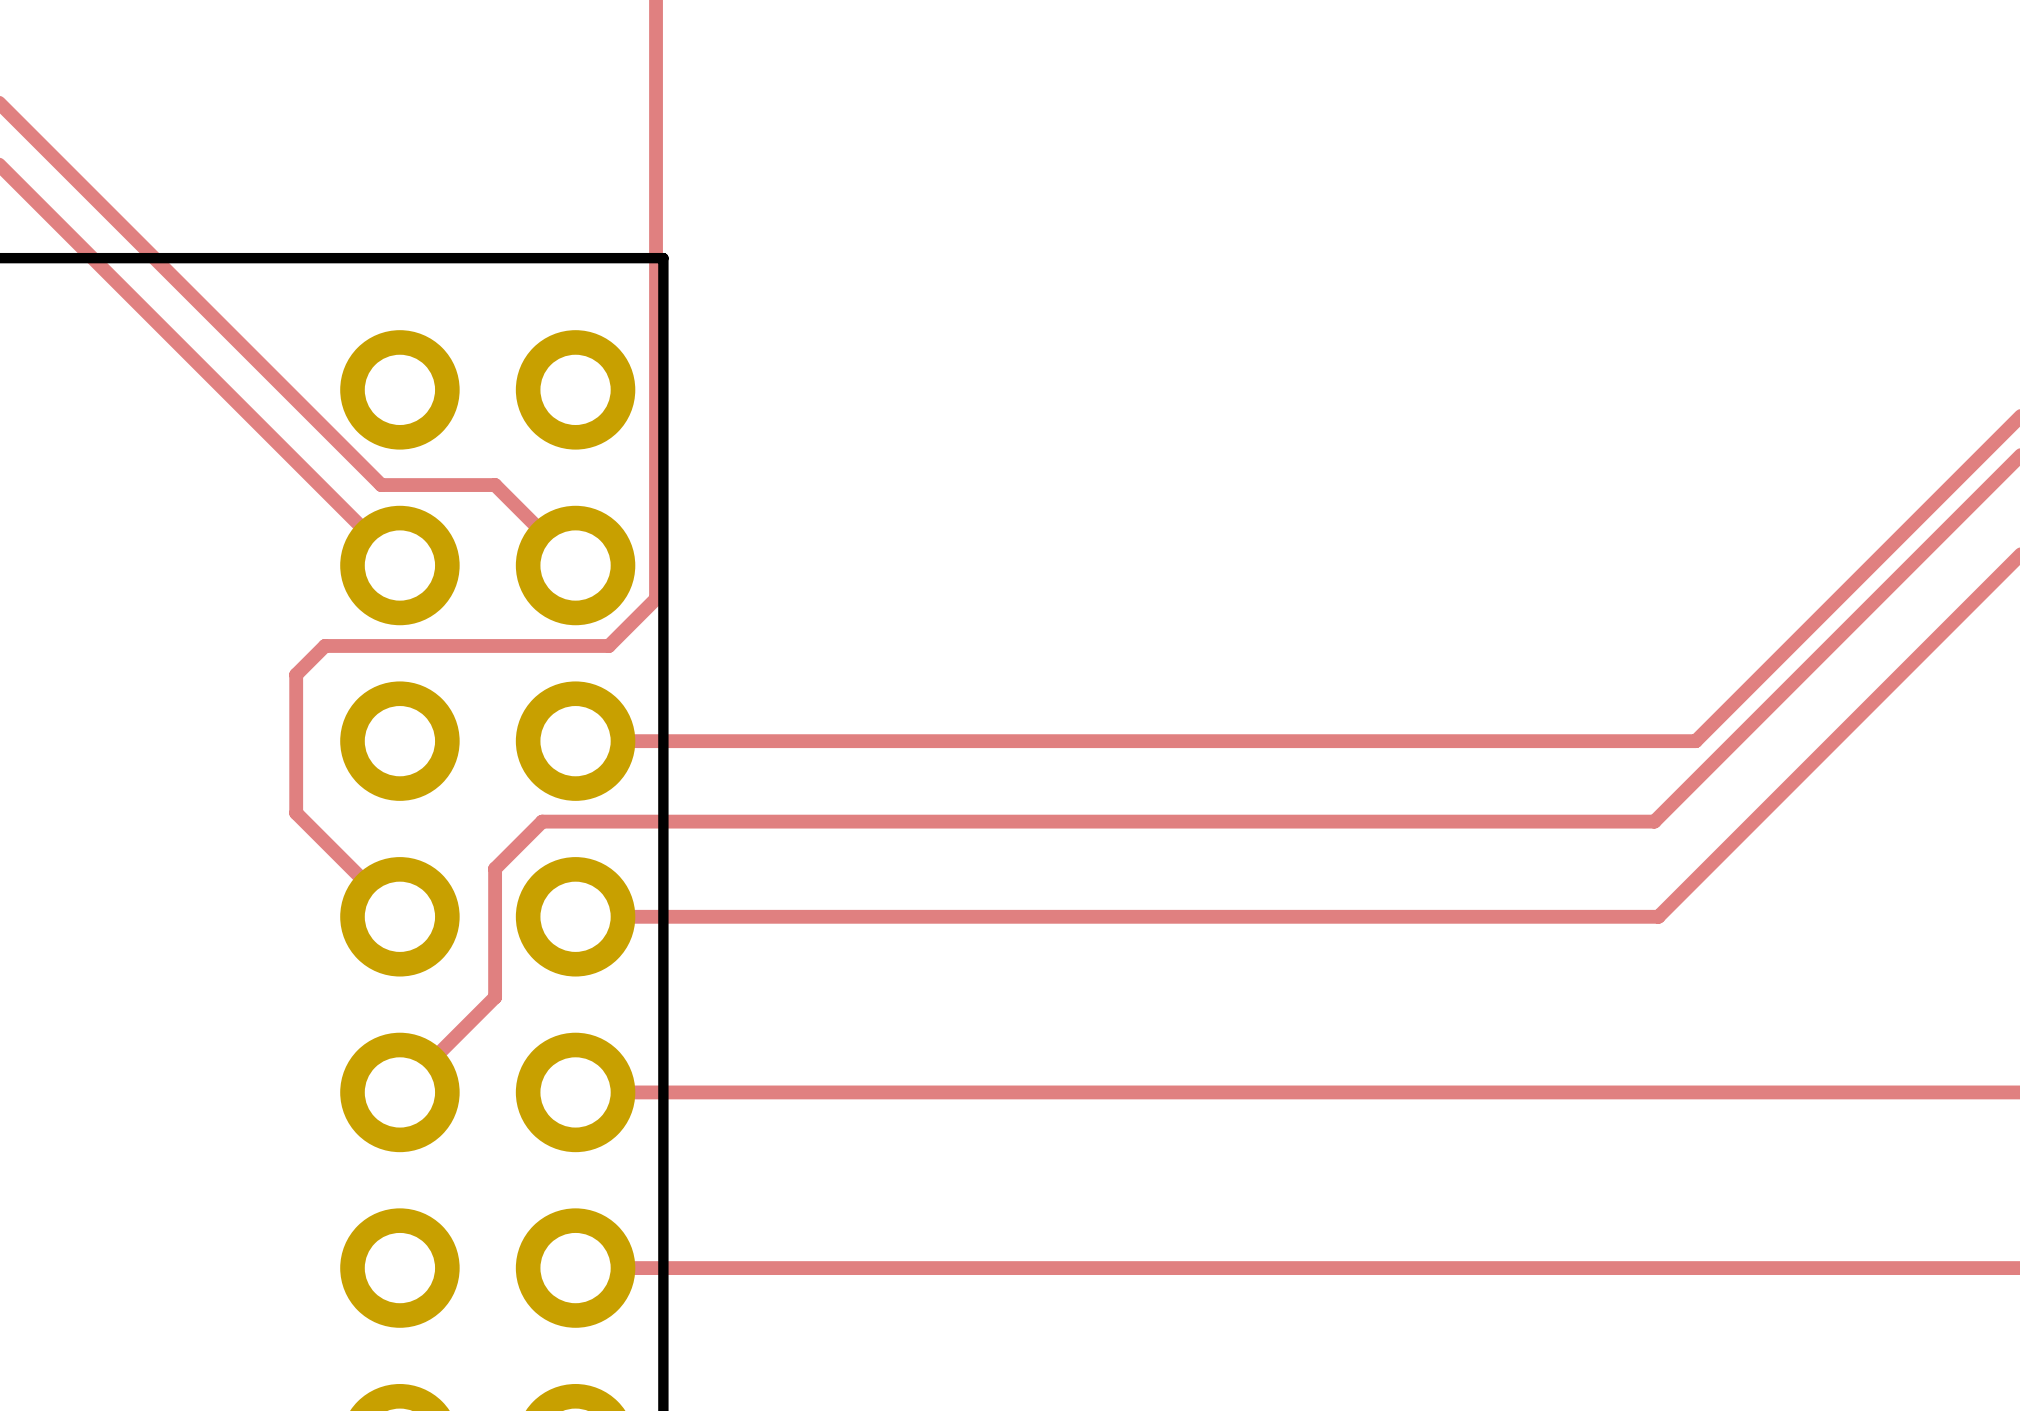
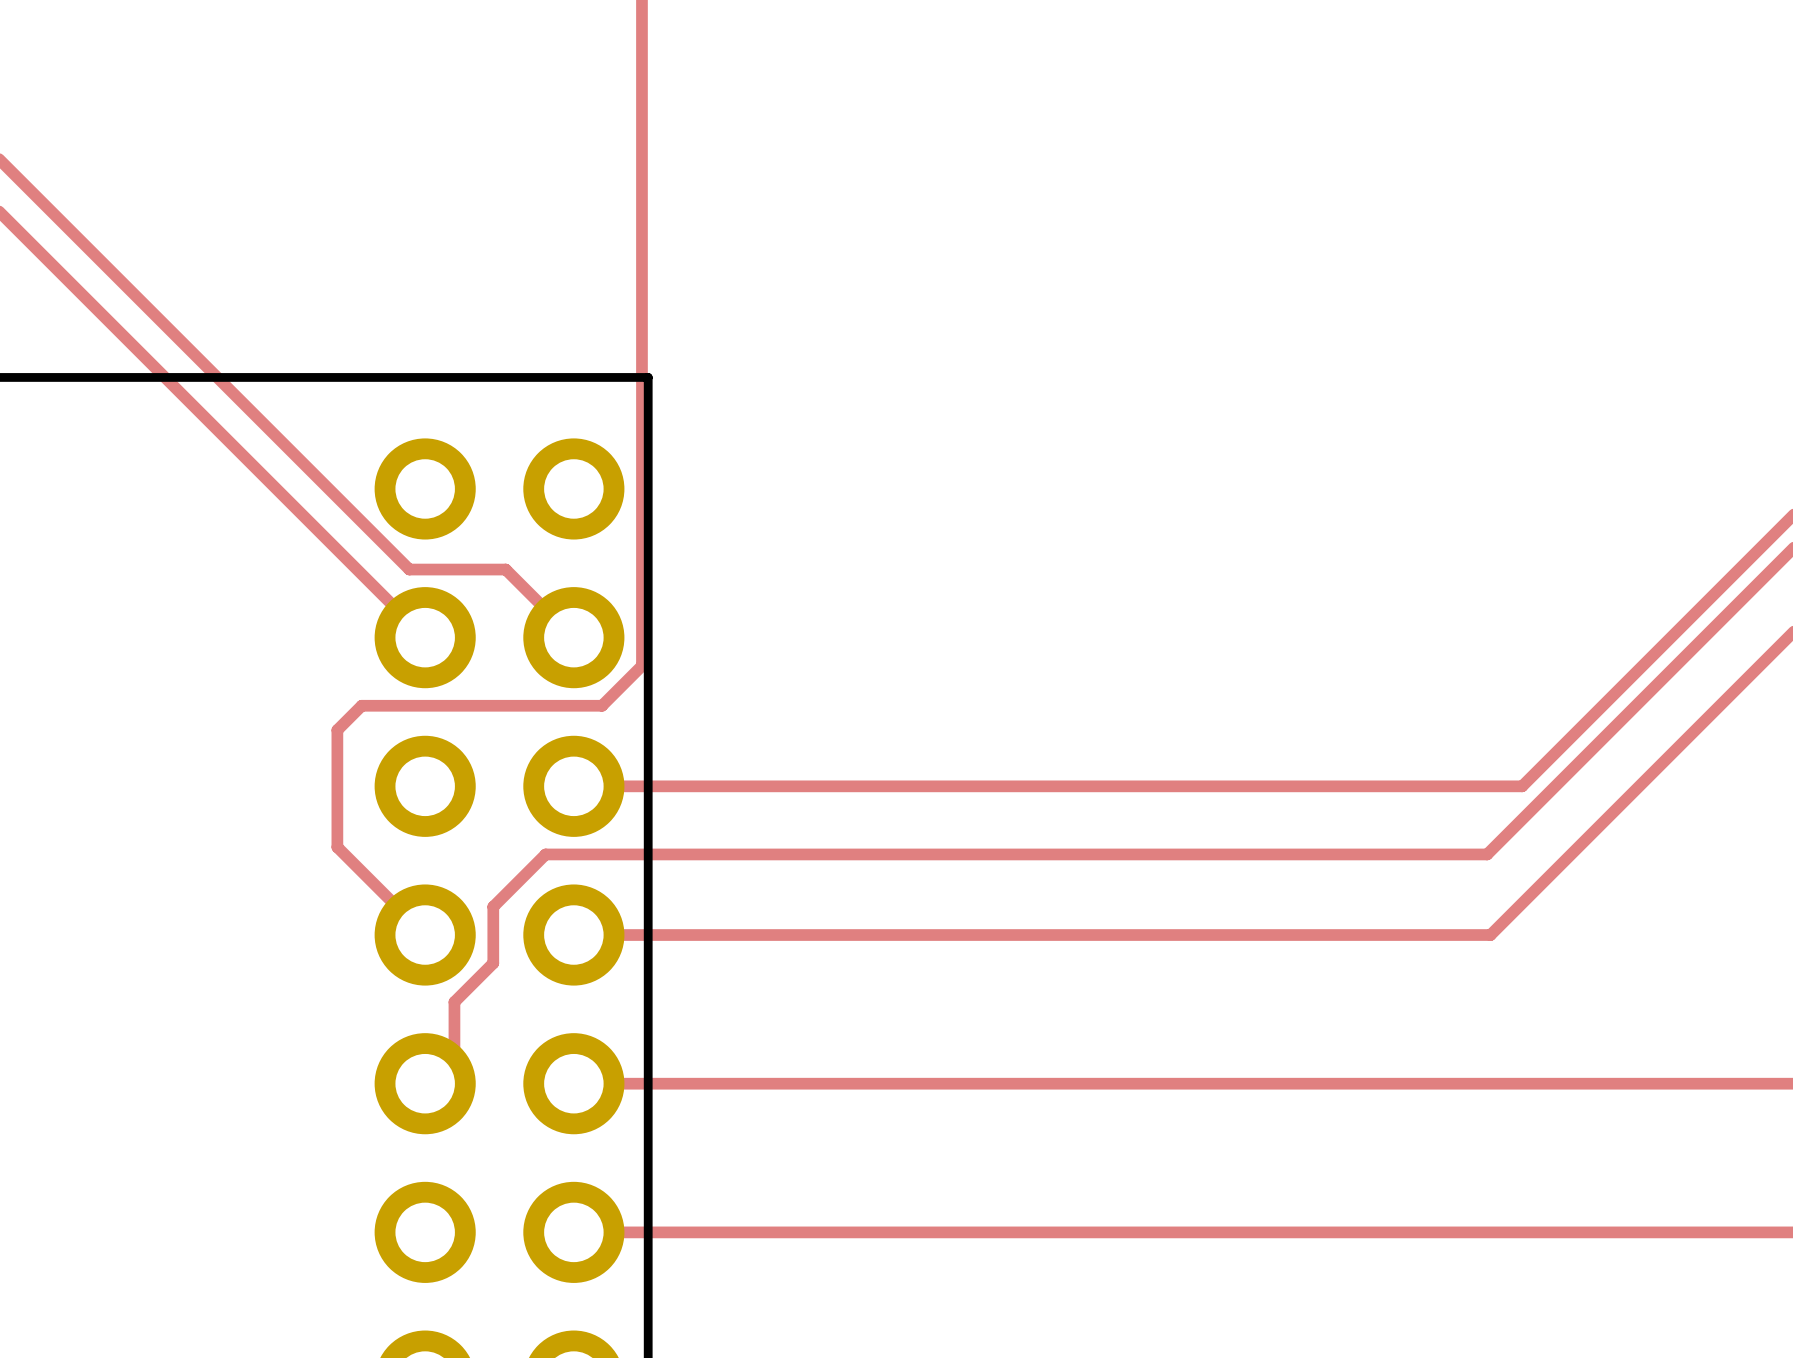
track: (495, 868) (495, 997) (434, 1057) -> (505, 894) (493, 906) (493, 963) (454, 1002) (454, 1054)

